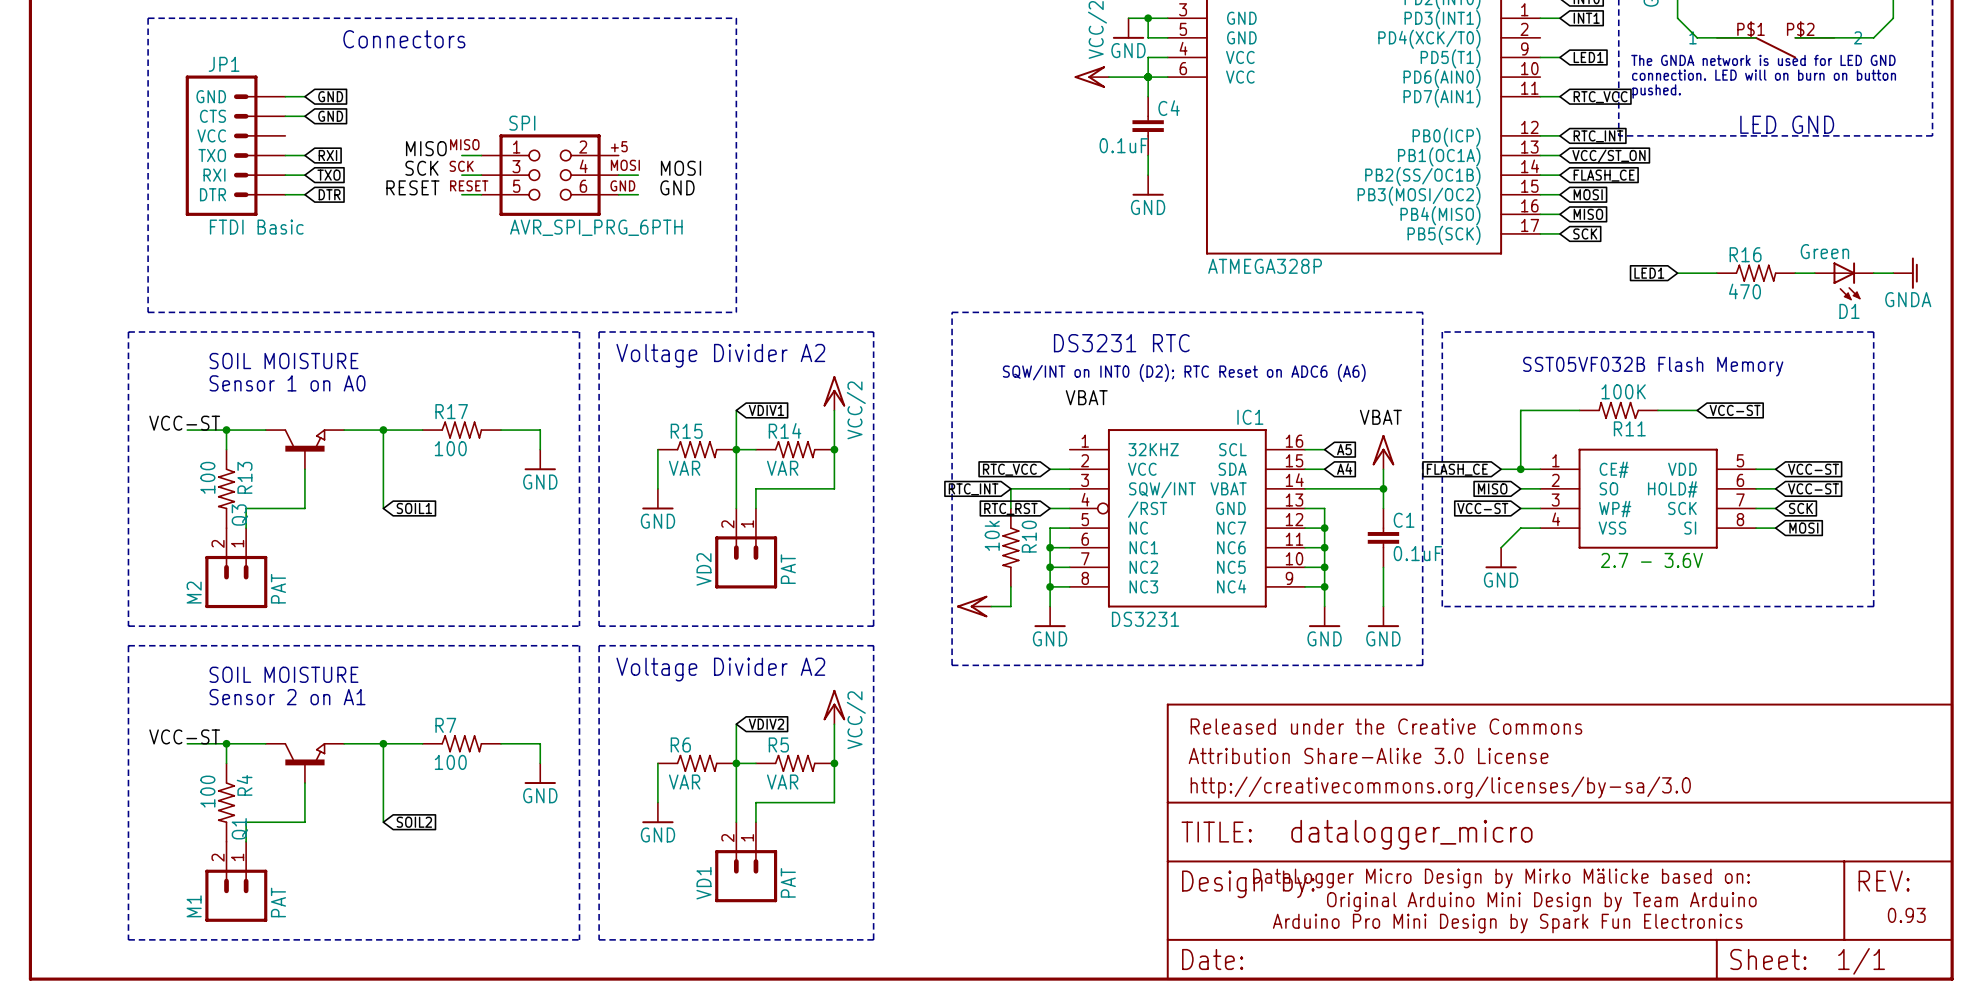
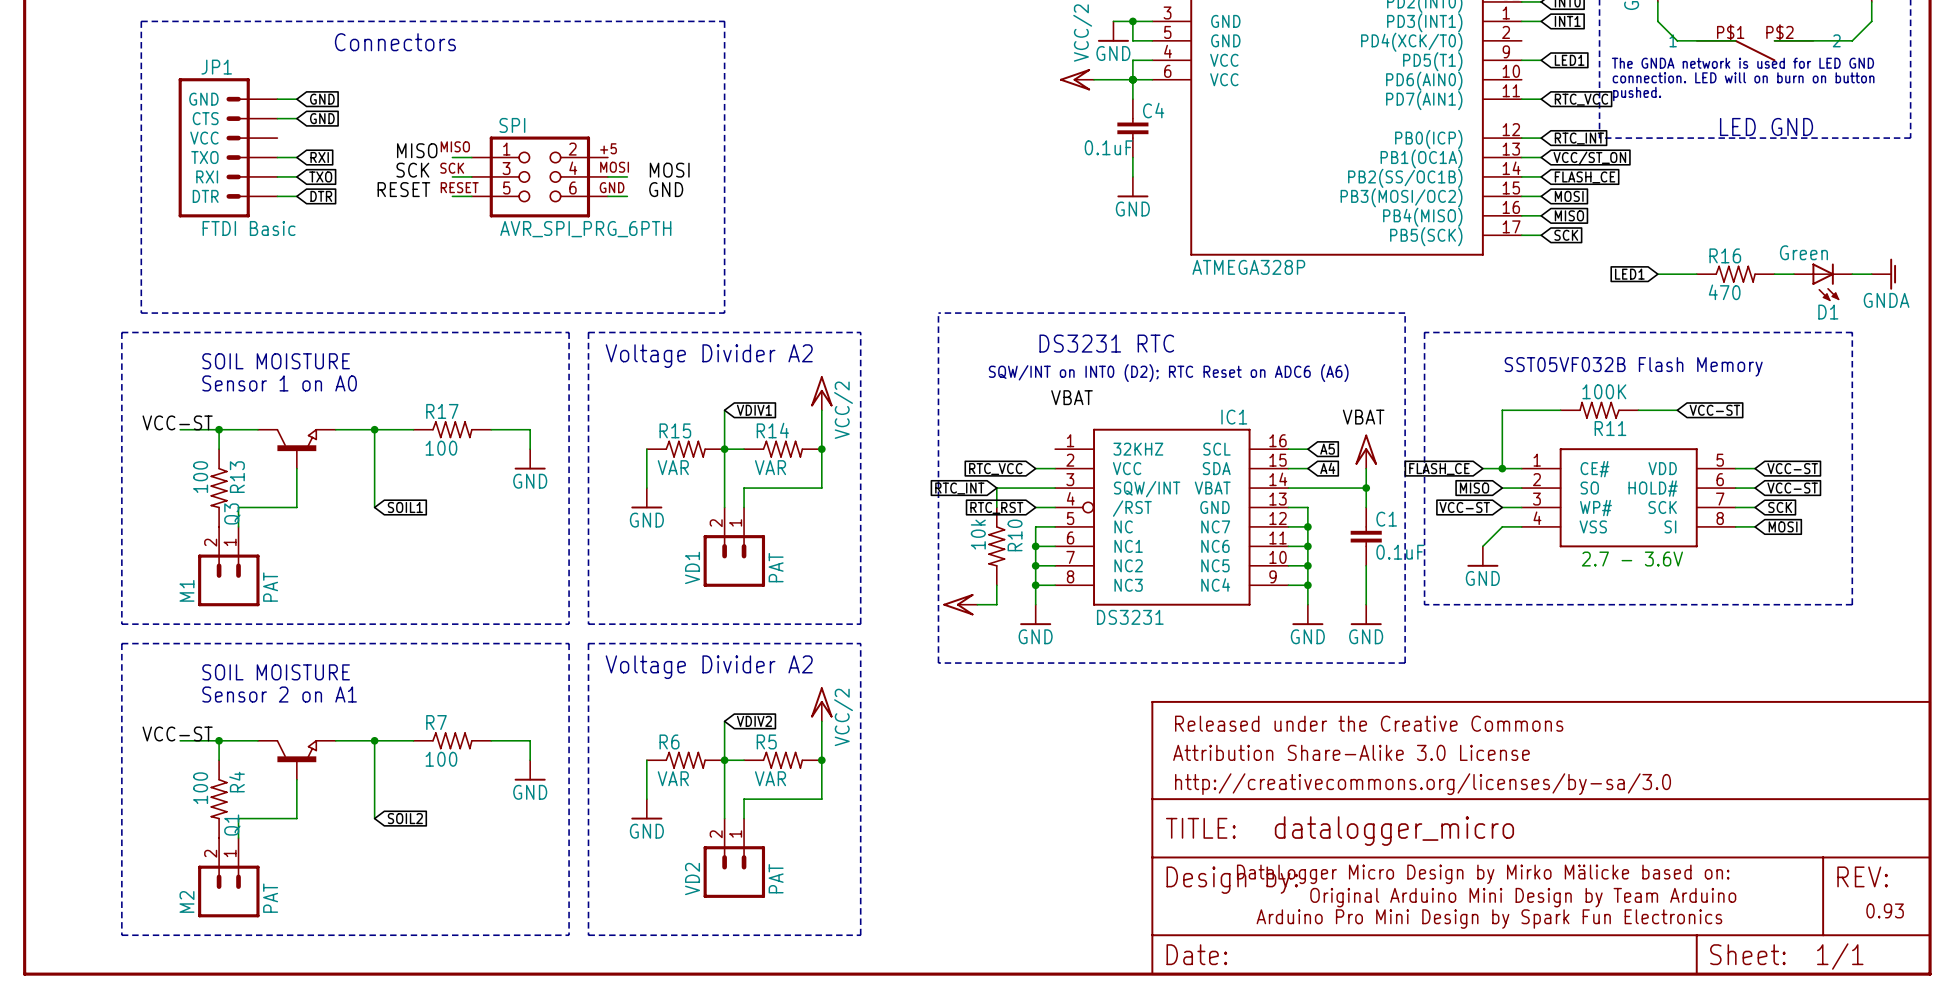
VD2 name: VD2 (703, 569) -> VD1 (692, 567)
M2 name: M2 (194, 592) -> M1 (186, 590)
VD1 name: VD1 (703, 883) -> VD2 (692, 879)
M1 name: M1 (194, 906) -> M2 (186, 901)

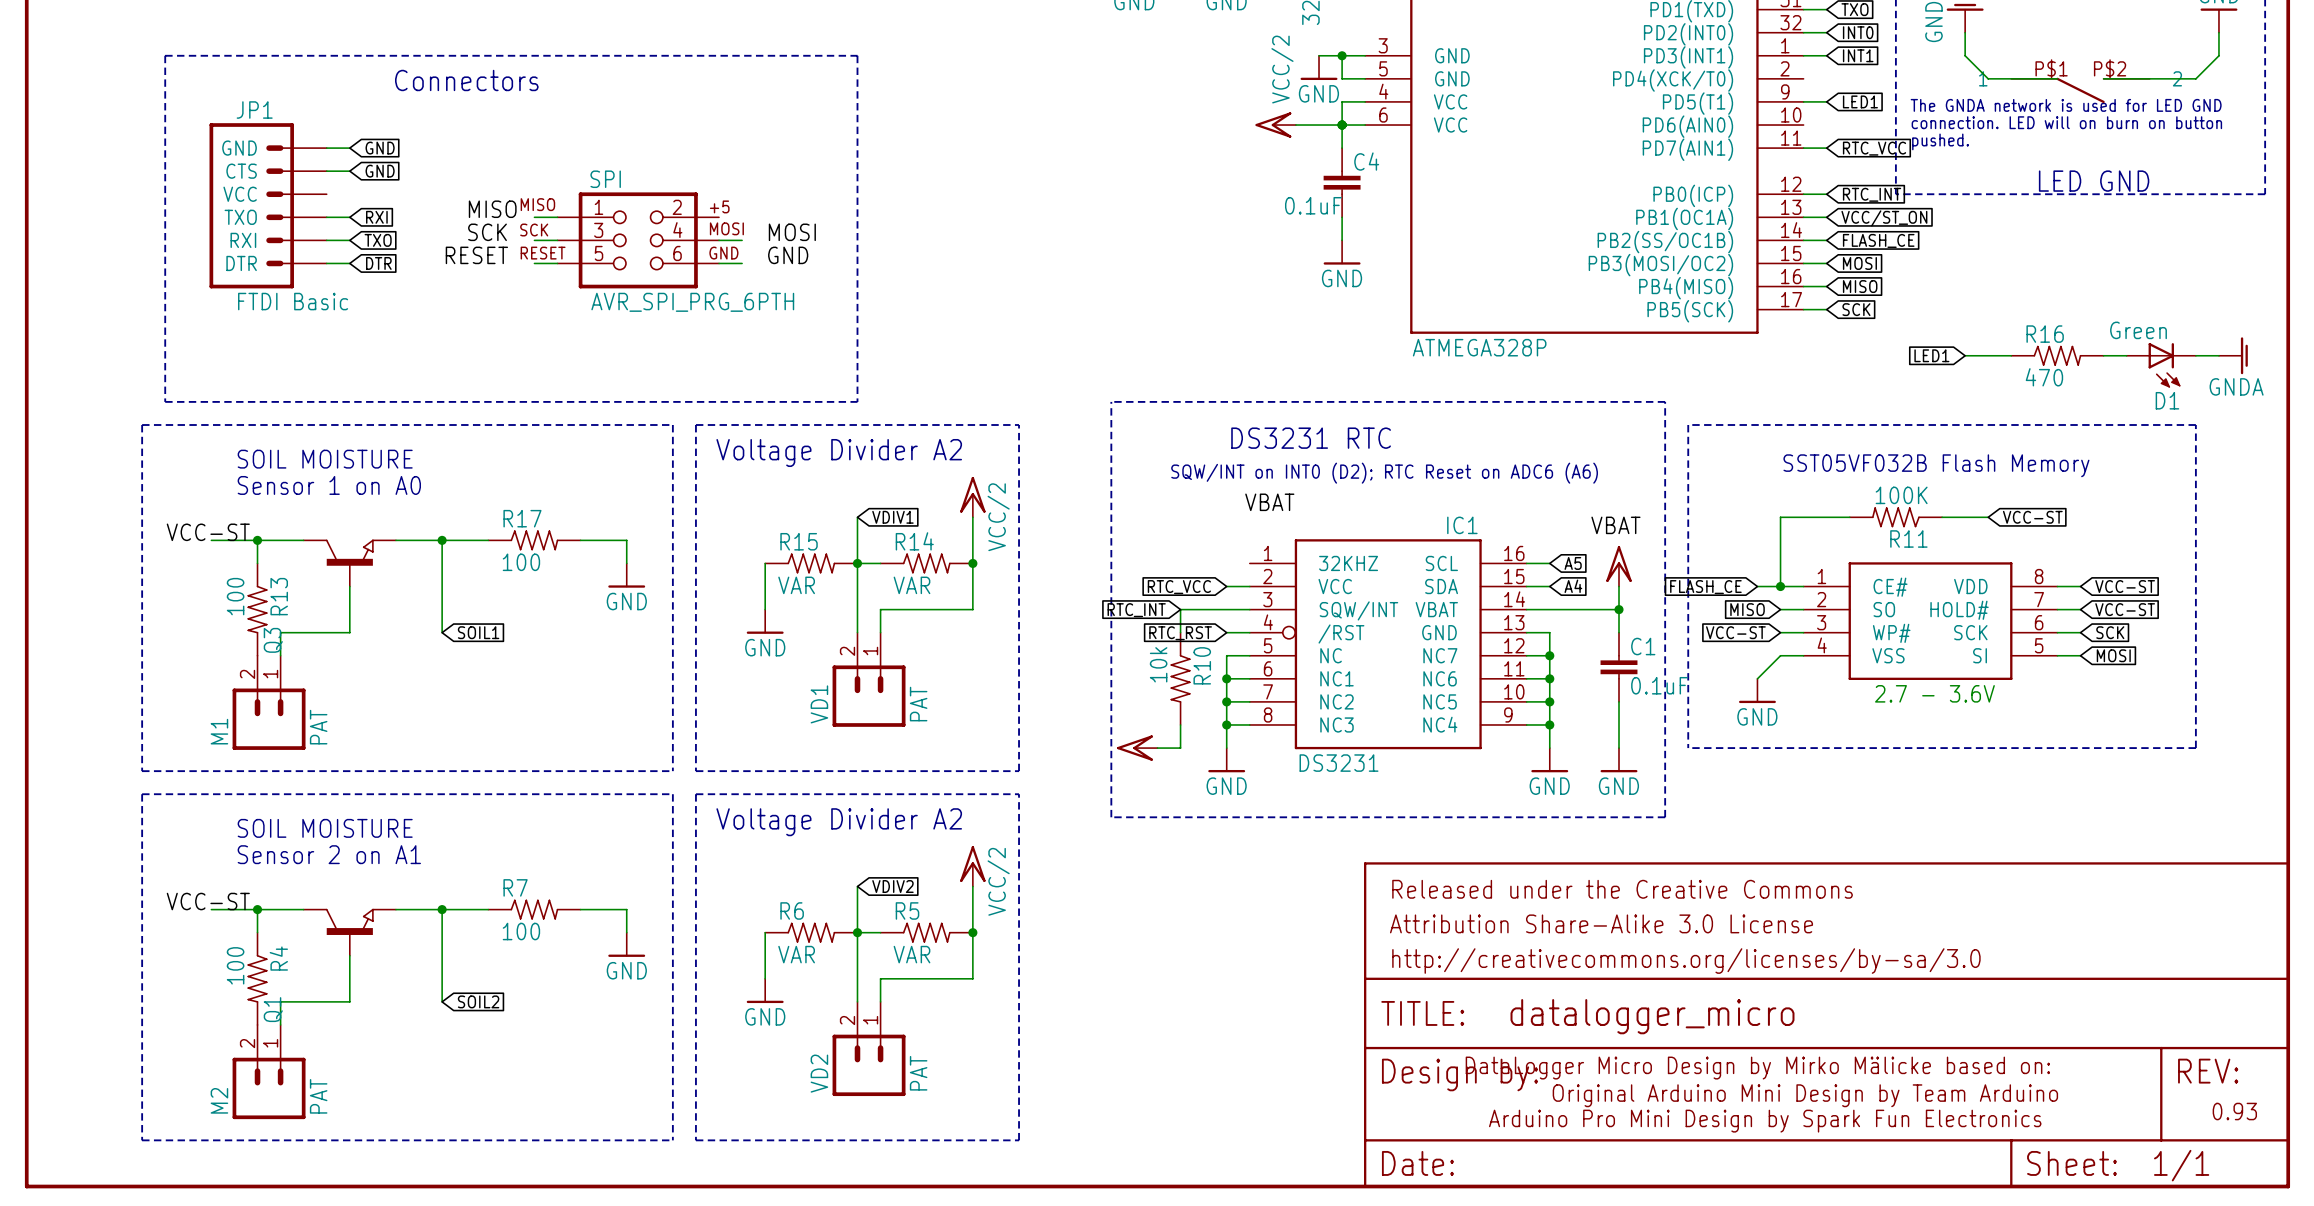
part pin number: 5 (1720, 460) -> 8 (2039, 576)
part pin number: 6 (1720, 479) -> 7 (2039, 599)
part pin number: 7 (1720, 499) -> 6 (2039, 622)
part pin number: 8 (1720, 518) -> 5 (2039, 645)

